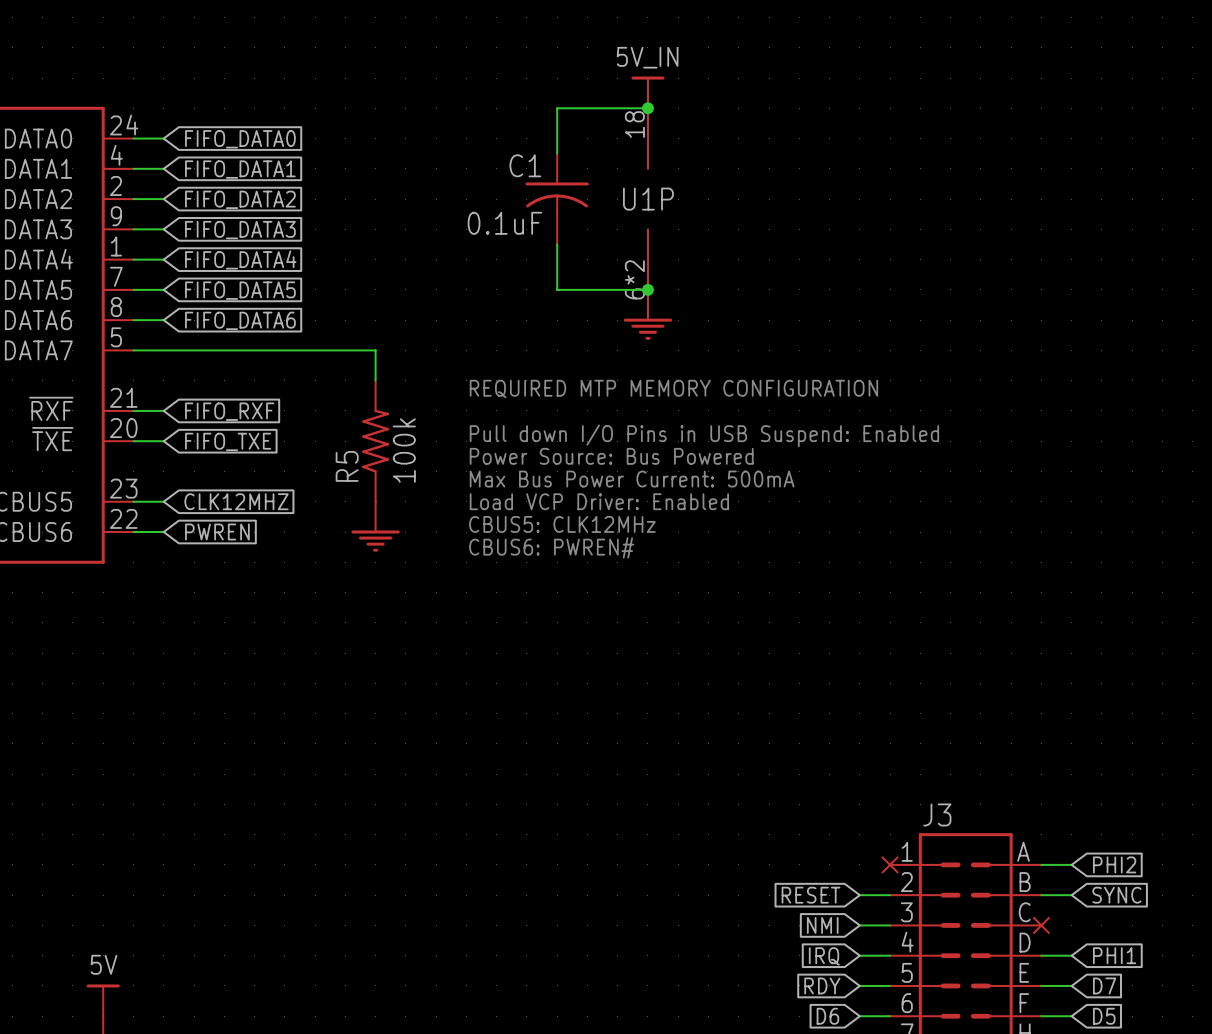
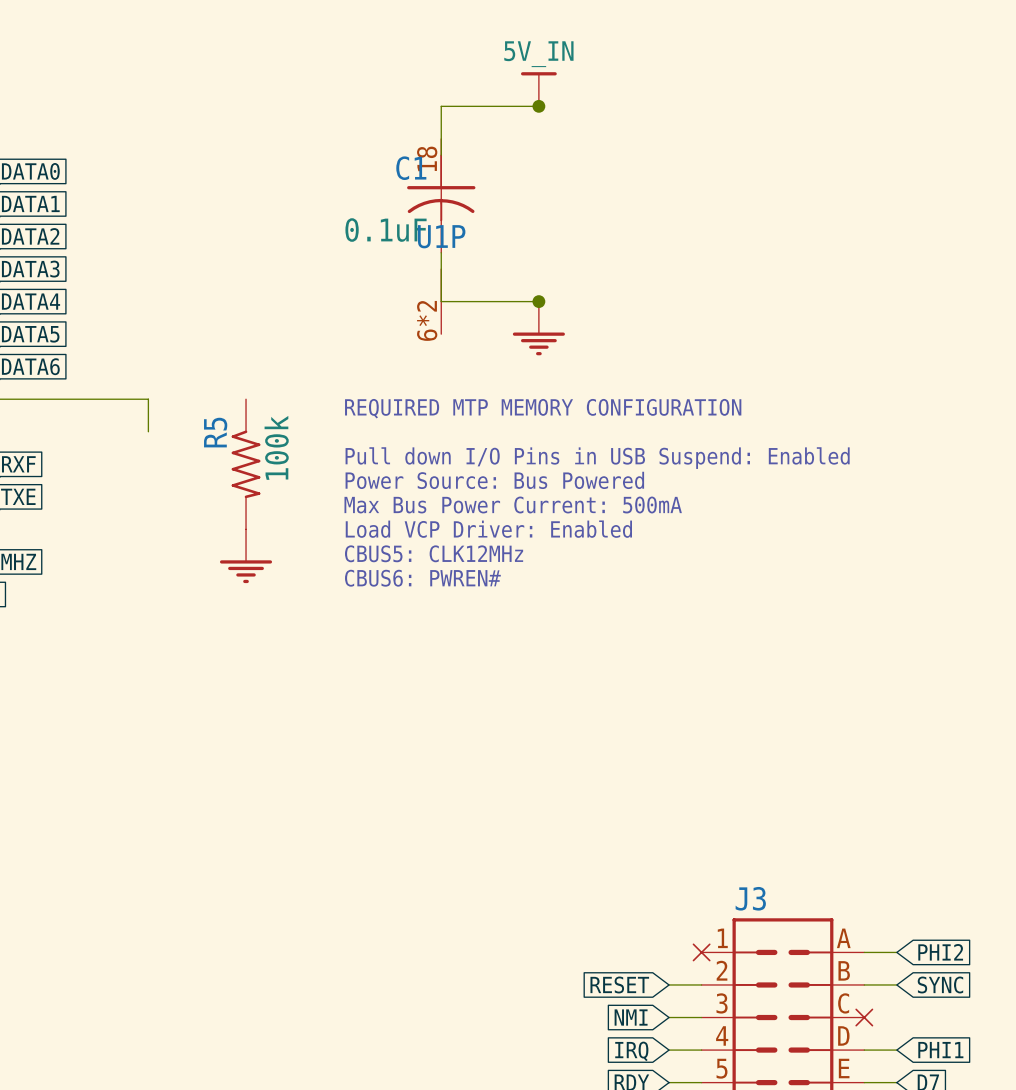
junction: none -> (538, 106)
power symbol position: 5V_IN (647, 92) -> 5V_IN (538, 89)
wire: (647, 108) (557, 108) (557, 153) -> (538, 106) (441, 106) (441, 155)
junction: (647, 108) -> none
C1 position: (557, 199) -> (441, 203)
wire: (557, 244) (557, 289) (647, 289) -> (441, 252) (441, 301) (538, 301)
junction: none -> (538, 301)
junction: (647, 289) -> none
power symbol position: (647, 314) -> (538, 328)
text position: REQUIRED MTP MEMORY CONFIGURATION (673, 388) -> REQUIRED MTP MEMORY CONFIGURATION (543, 408)
text position: Pull down I/O Pins in USB Suspend: Enabled (704, 435) -> Pull down I/O Pins in USB Suspend: Enabled (597, 458)
R5 flip: as is (375, 441) -> up-down (246, 464)
R5 position: (375, 441) -> (246, 464)
text position: Power Source: Bus Powered (611, 456) -> Power Source: Bus Powered (494, 480)
text position: Max Bus Power Current: 500mA (632, 479) -> Max Bus Power Current: 500mA (513, 505)
text position: Load VCP Driver: Enabled (599, 501) -> Load VCP Driver: Enabled (488, 529)
text position: CBUS5: CLK12MHz (562, 524) -> CBUS5: CLK12MHz (434, 553)
power symbol position: (375, 526) -> (246, 556)
text position: CBUS6: PWREN# (551, 547) -> CBUS6: PWREN# (422, 578)

